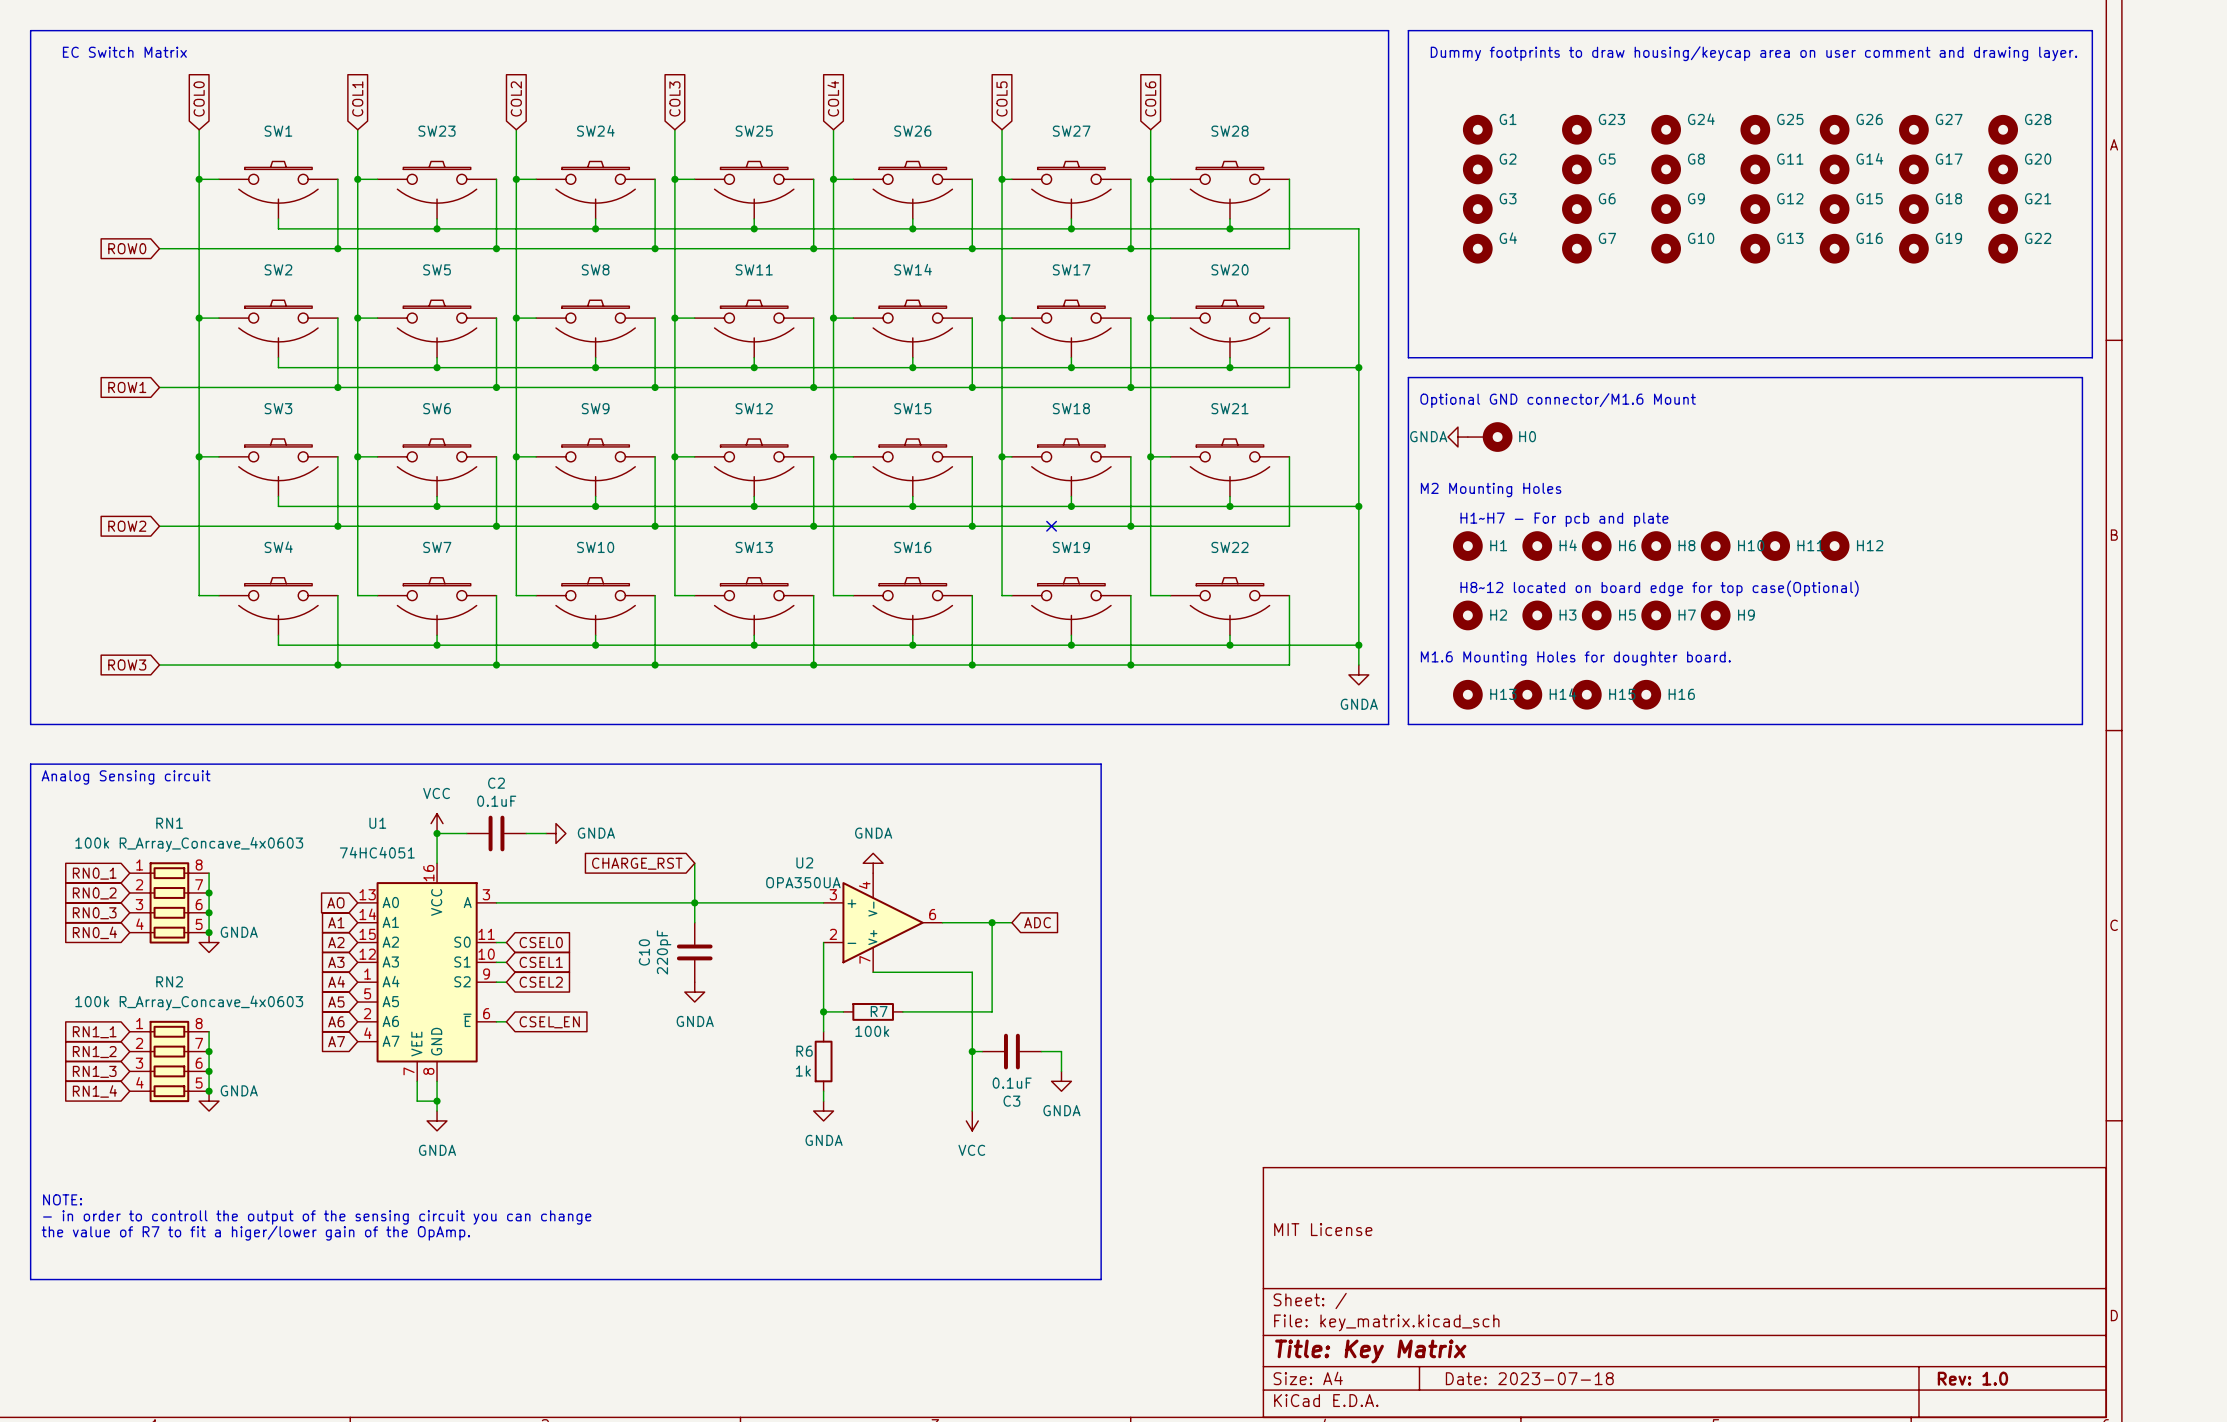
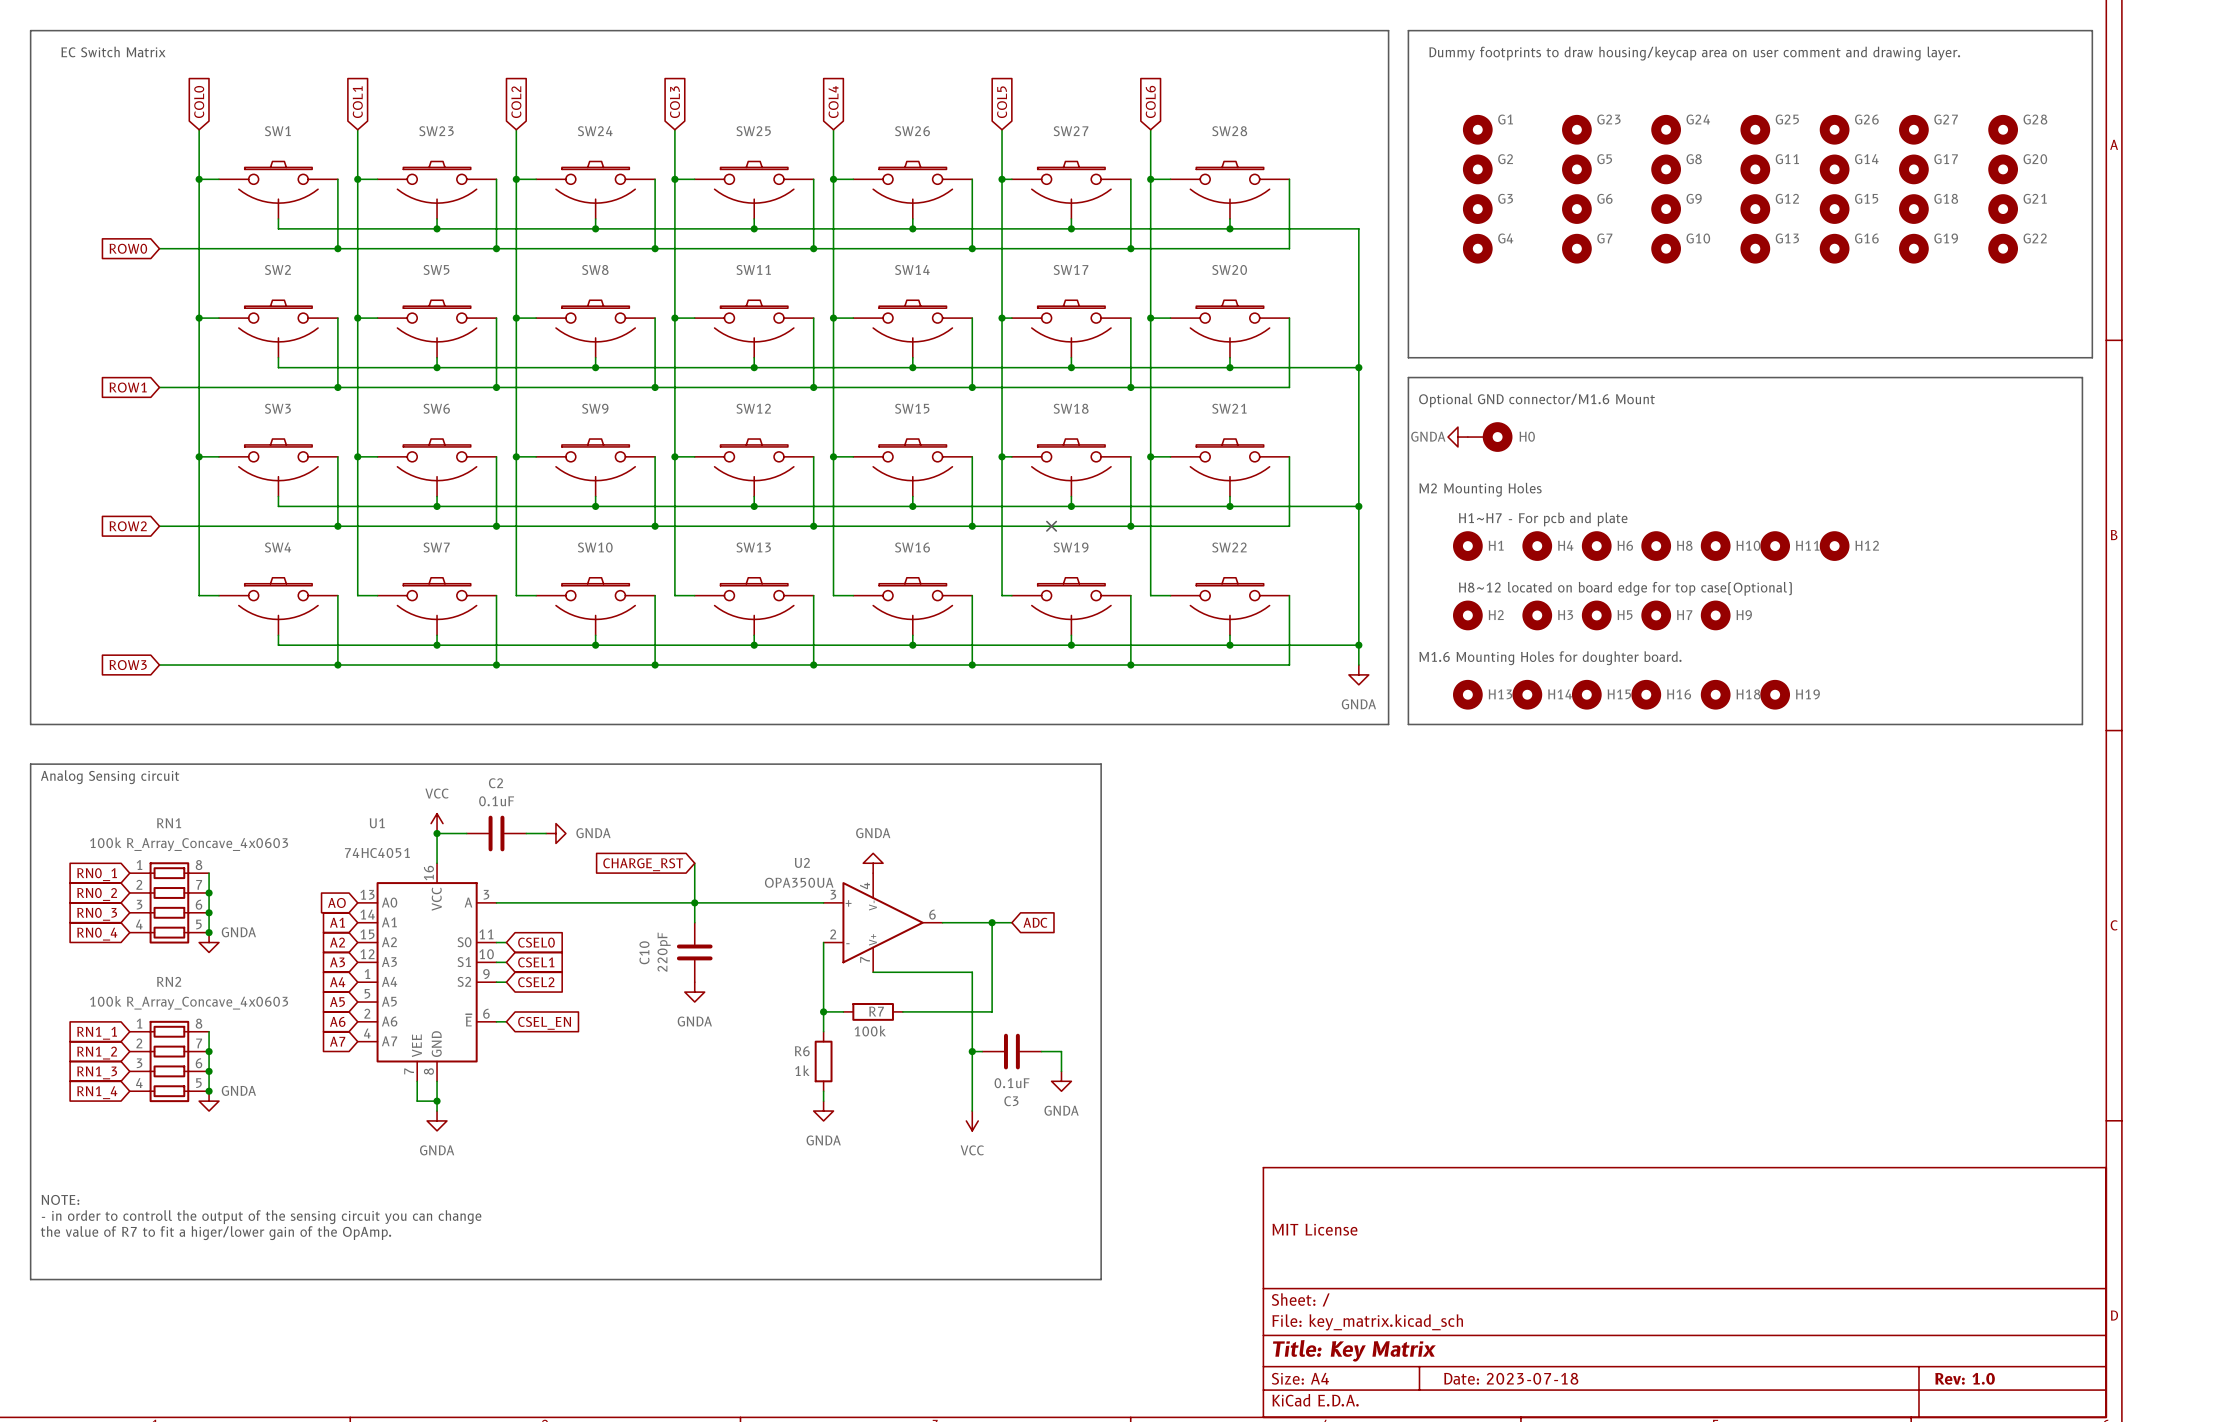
H18: none -> (1715, 694)
H19: none -> (1775, 694)

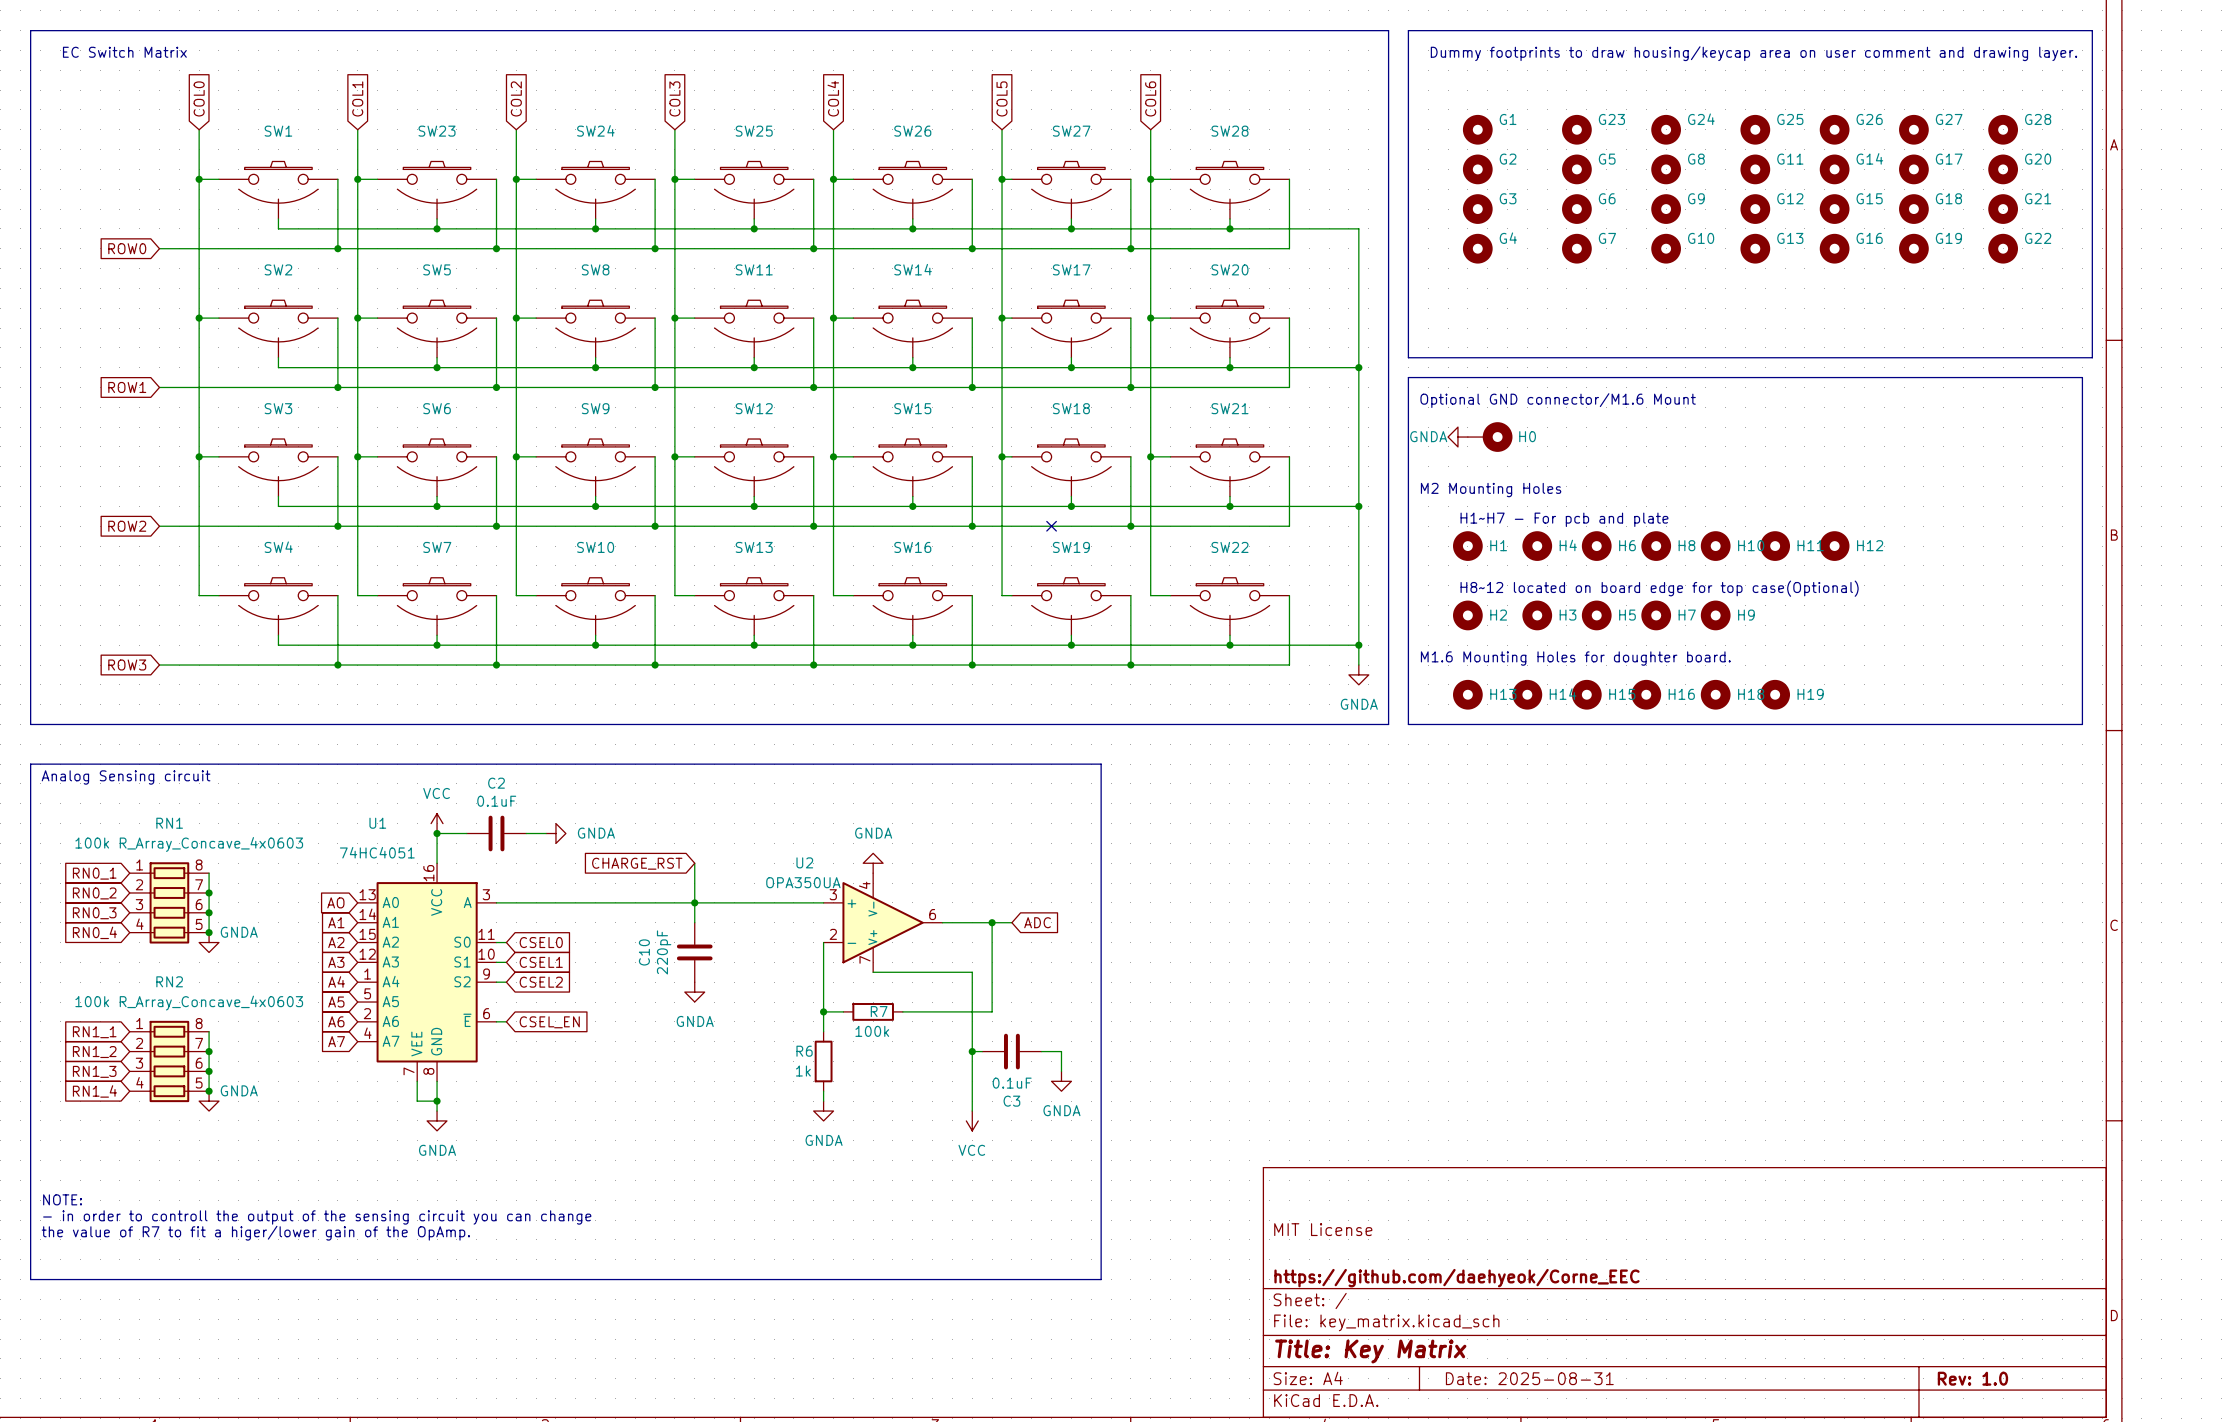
title block: none -> https://github.com/daehyeok/Corne_EEC (1456, 1278)
title block: Date: 2023-07-18 (1511, 1378) -> Date: 2025-08-31 (1529, 1378)

